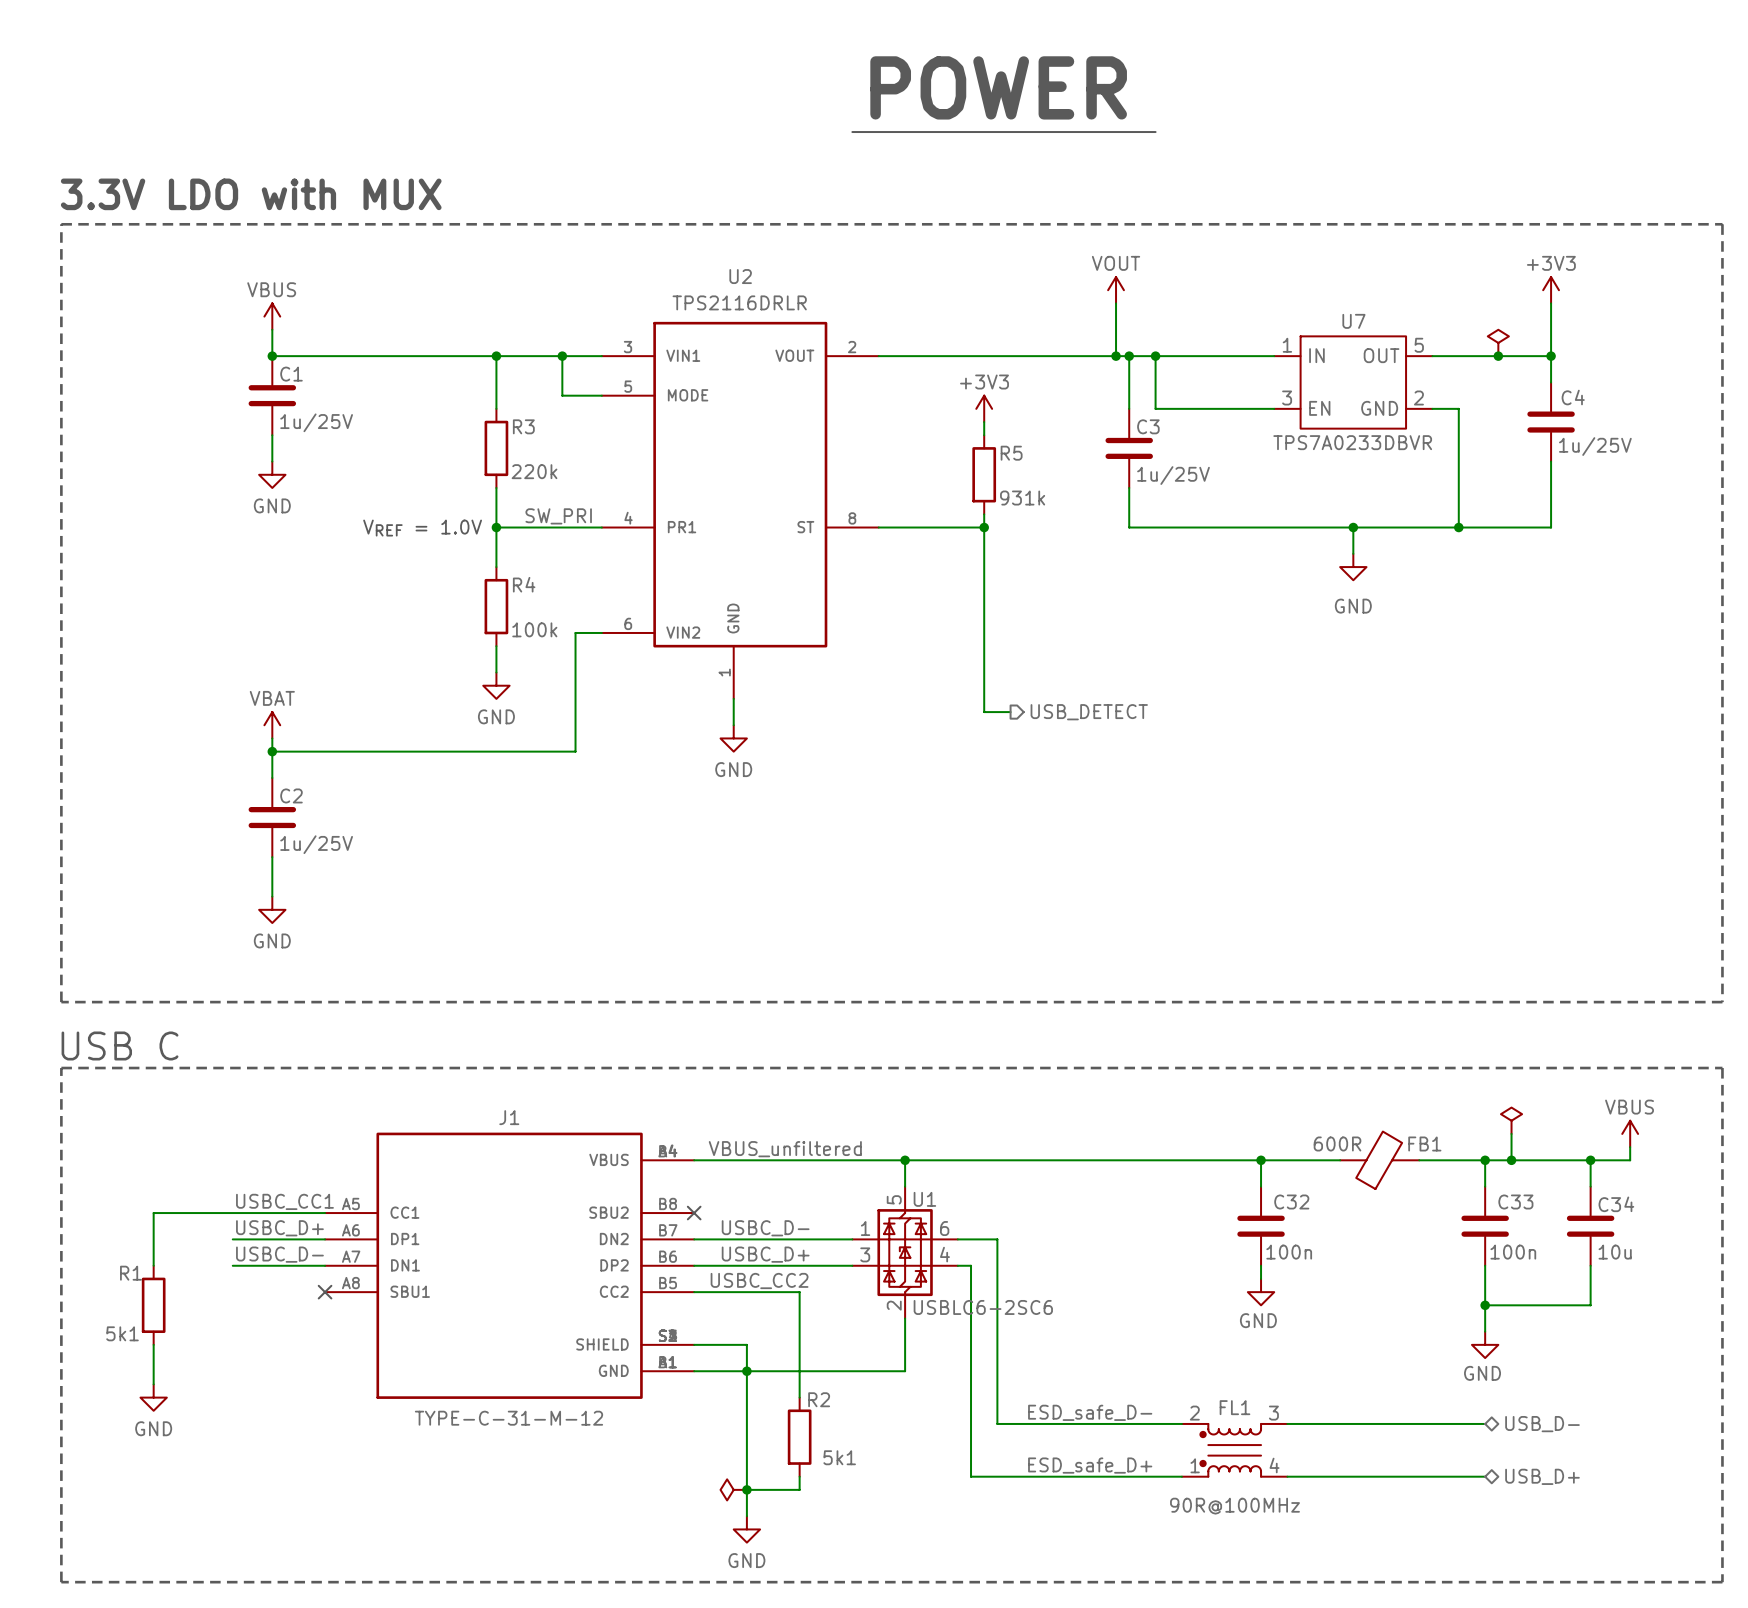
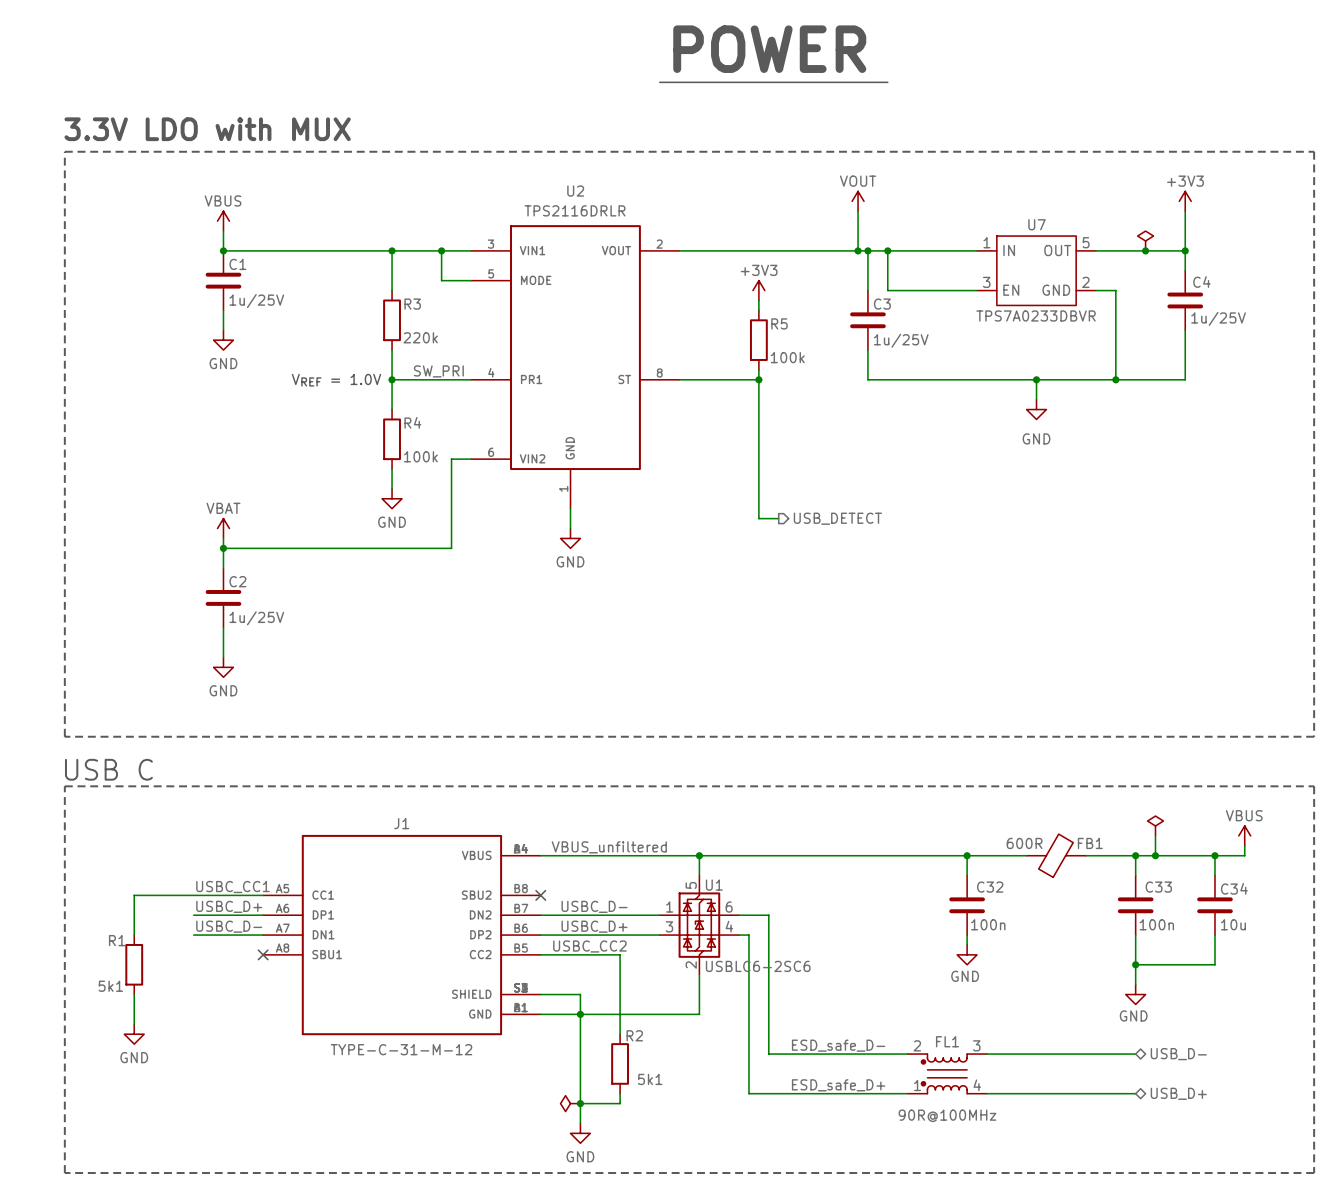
R5 value: 931k (1022, 498) -> 100k (787, 357)

